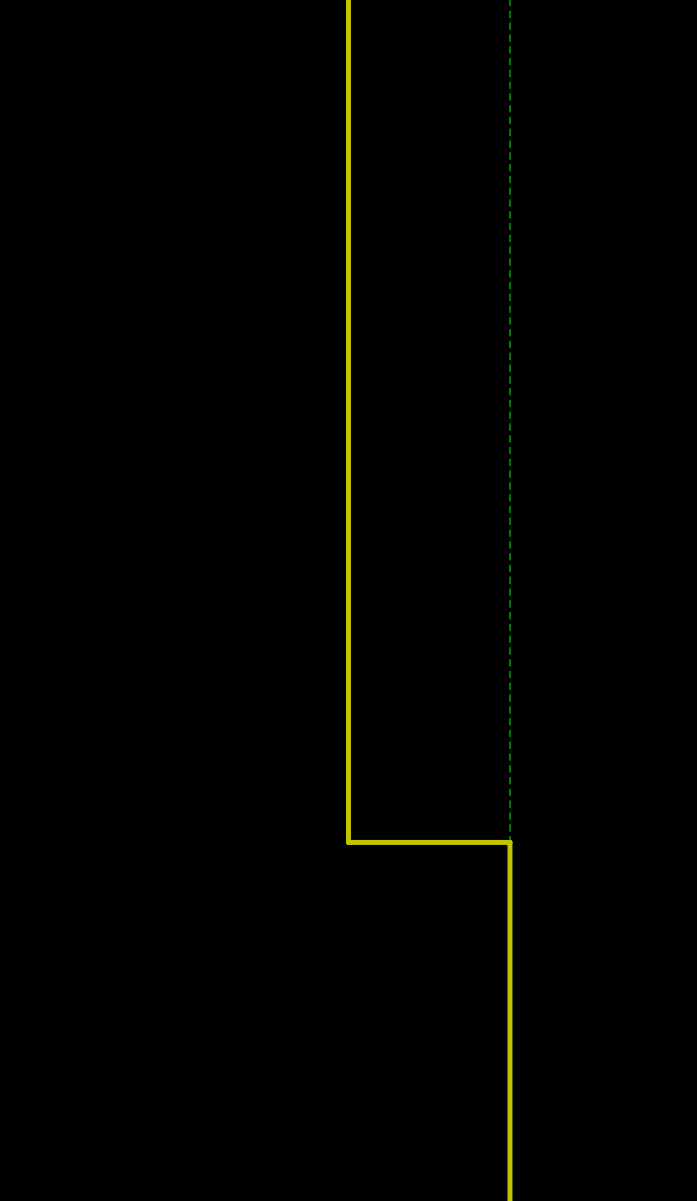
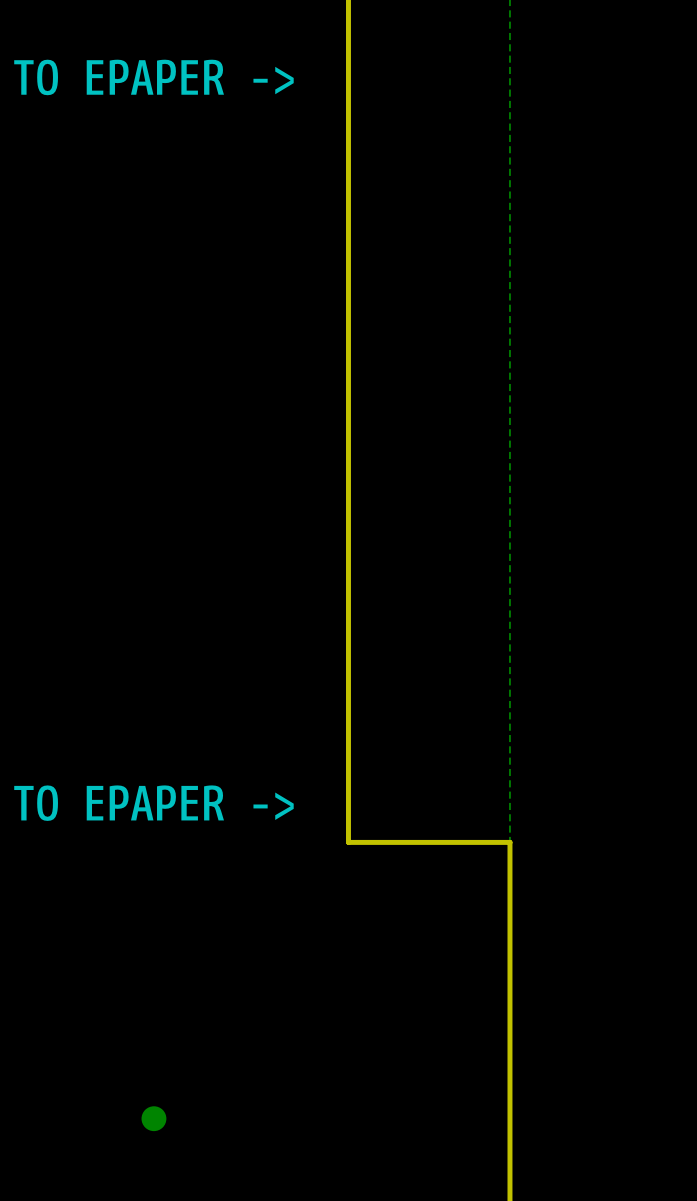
drawing: none -> [14, 59, 294, 96]
drawing: none -> [14, 785, 294, 821]
part: none -> (153, 1118)

